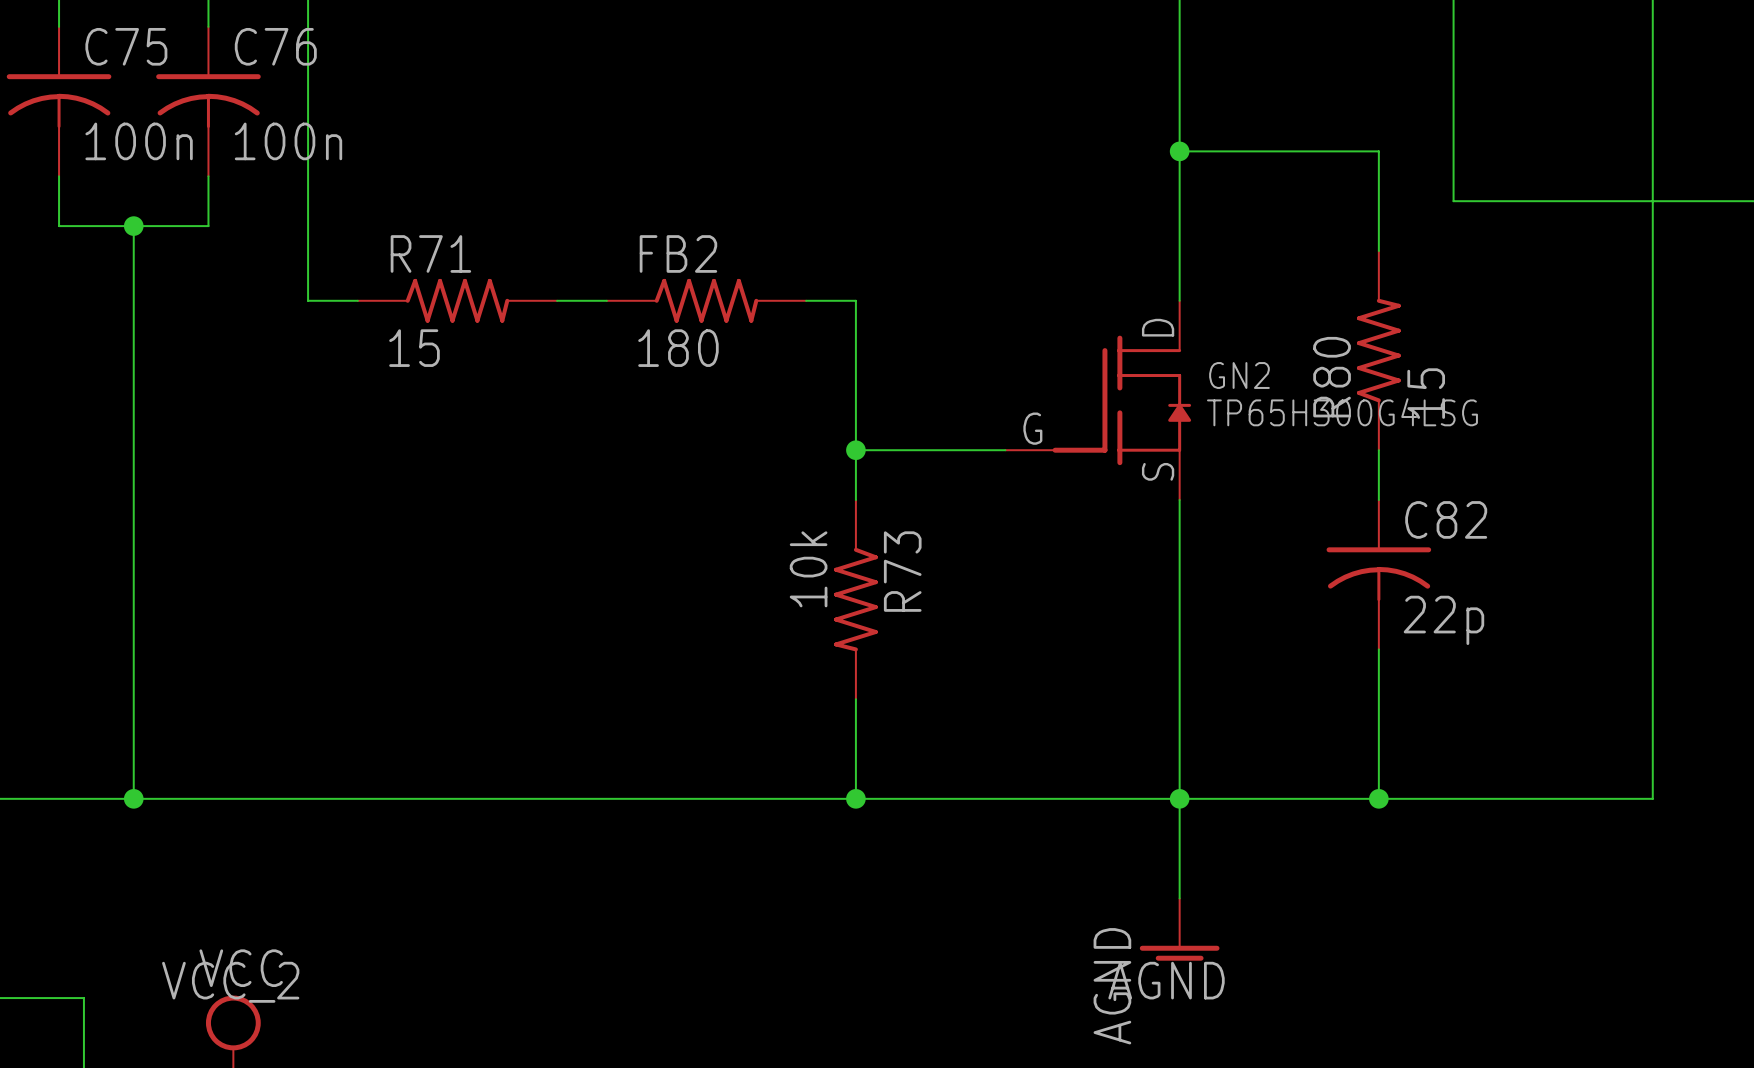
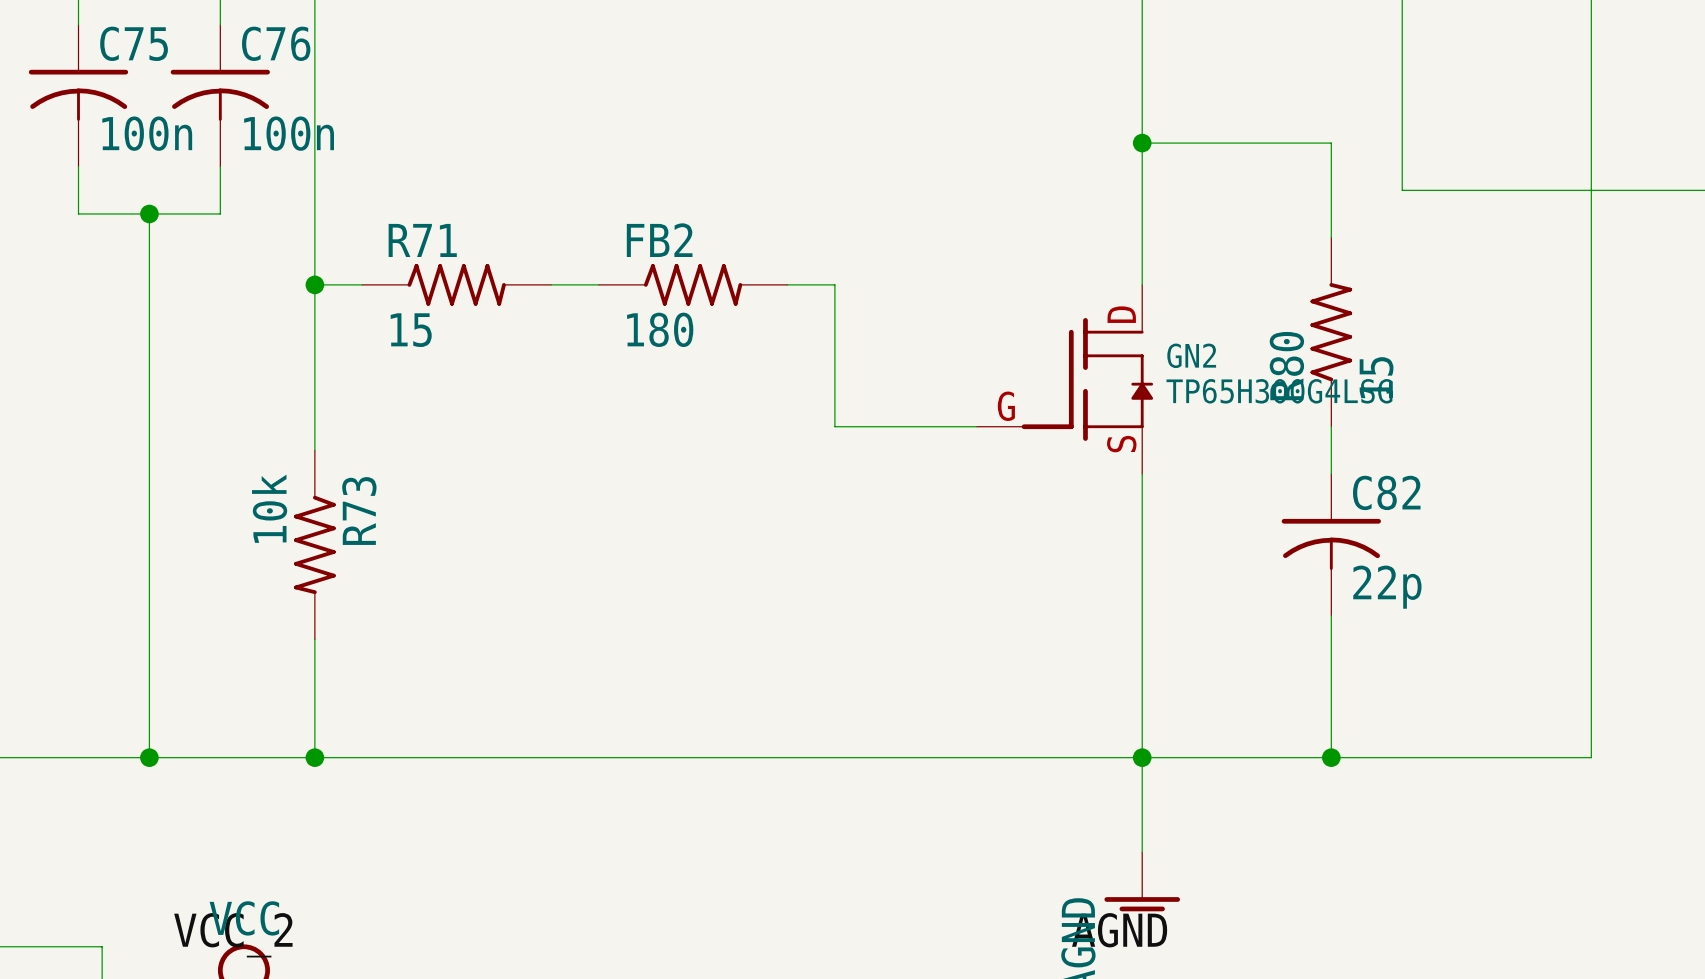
wire: none -> (314, 284) (314, 450)
junction: none -> (314, 284)
wire: (855, 450) (855, 500) -> none
junction: (855, 450) -> none
R73 position: (855, 599) -> (314, 544)
wire: none -> (314, 639) (314, 757)
wire: (855, 699) (855, 798) -> none
junction: none -> (314, 757)
junction: (855, 798) -> none

